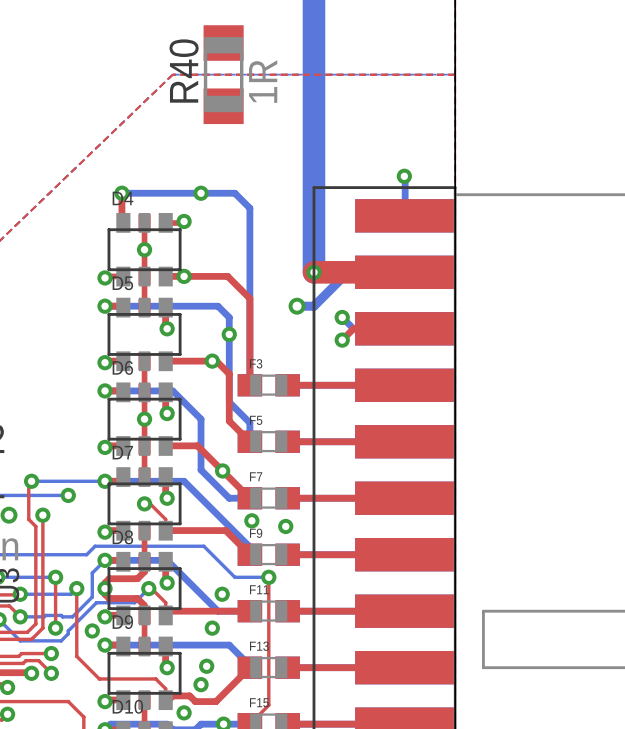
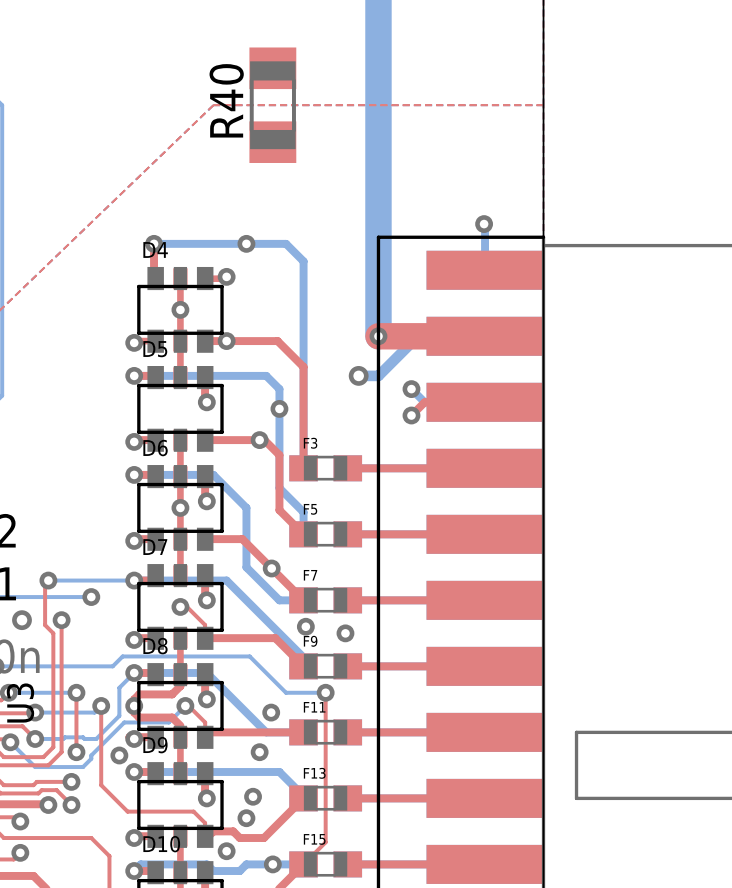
R40 value: 1R (263, 81) -> none

